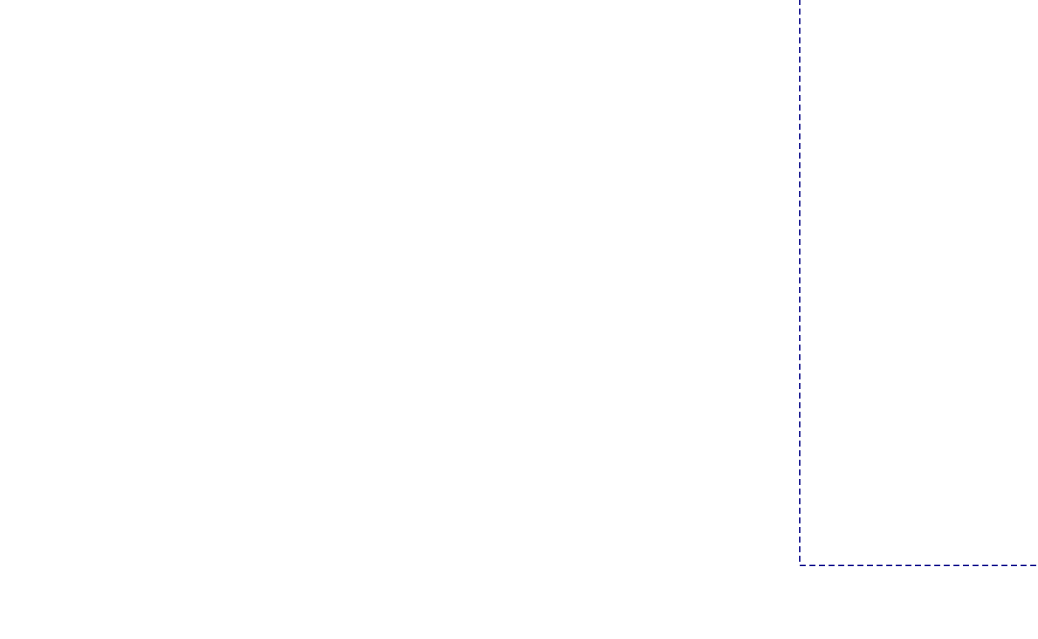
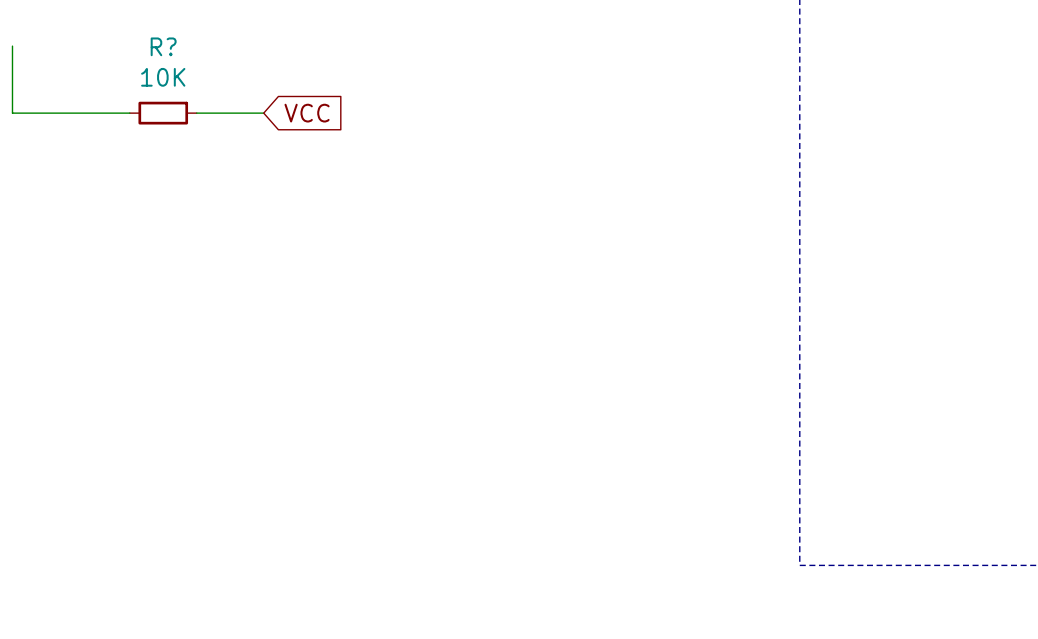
wire: none -> (12, 46) (12, 113) (129, 113)
R?: none -> 10K (163, 113)
wire: none -> (196, 113) (263, 113)
global label: none -> VCC (307, 113)

